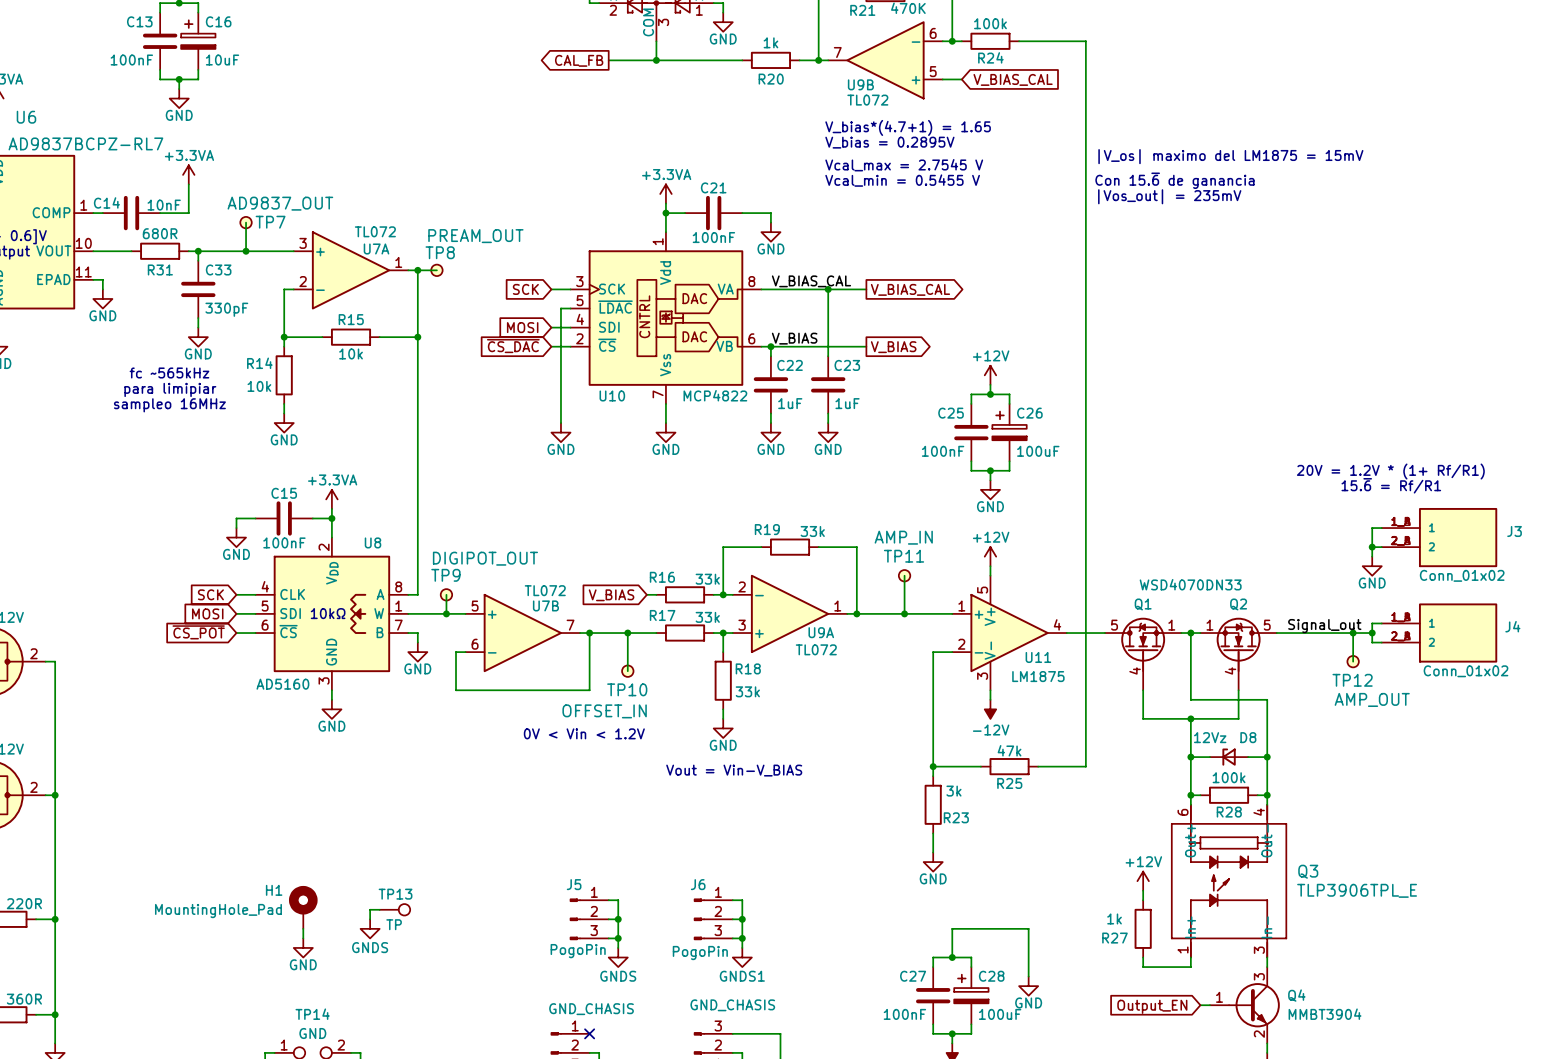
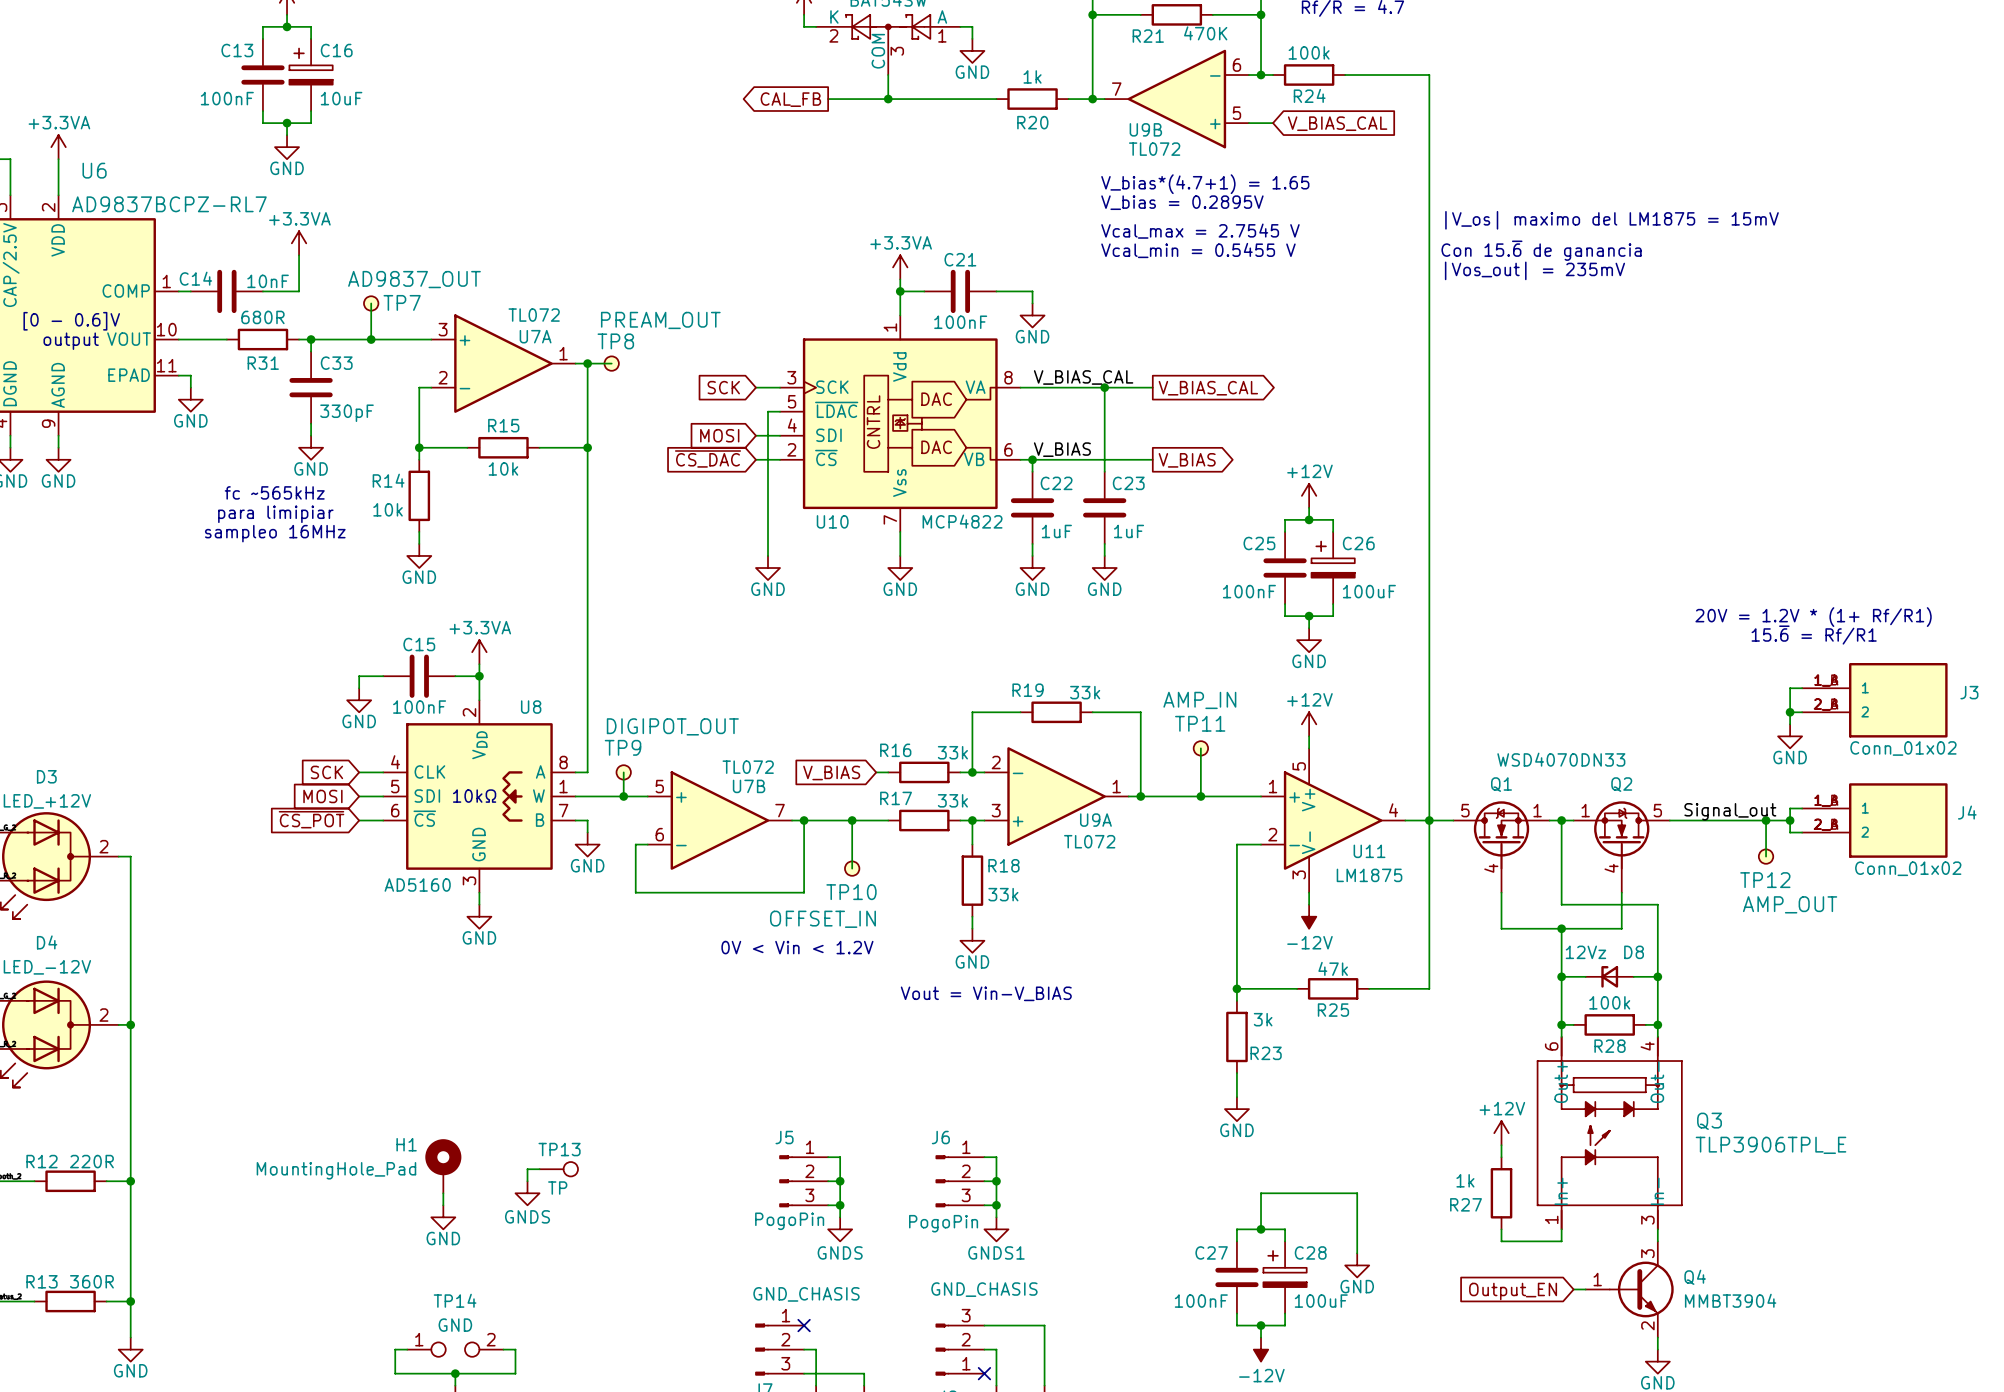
junction: none -> (1429, 820)

